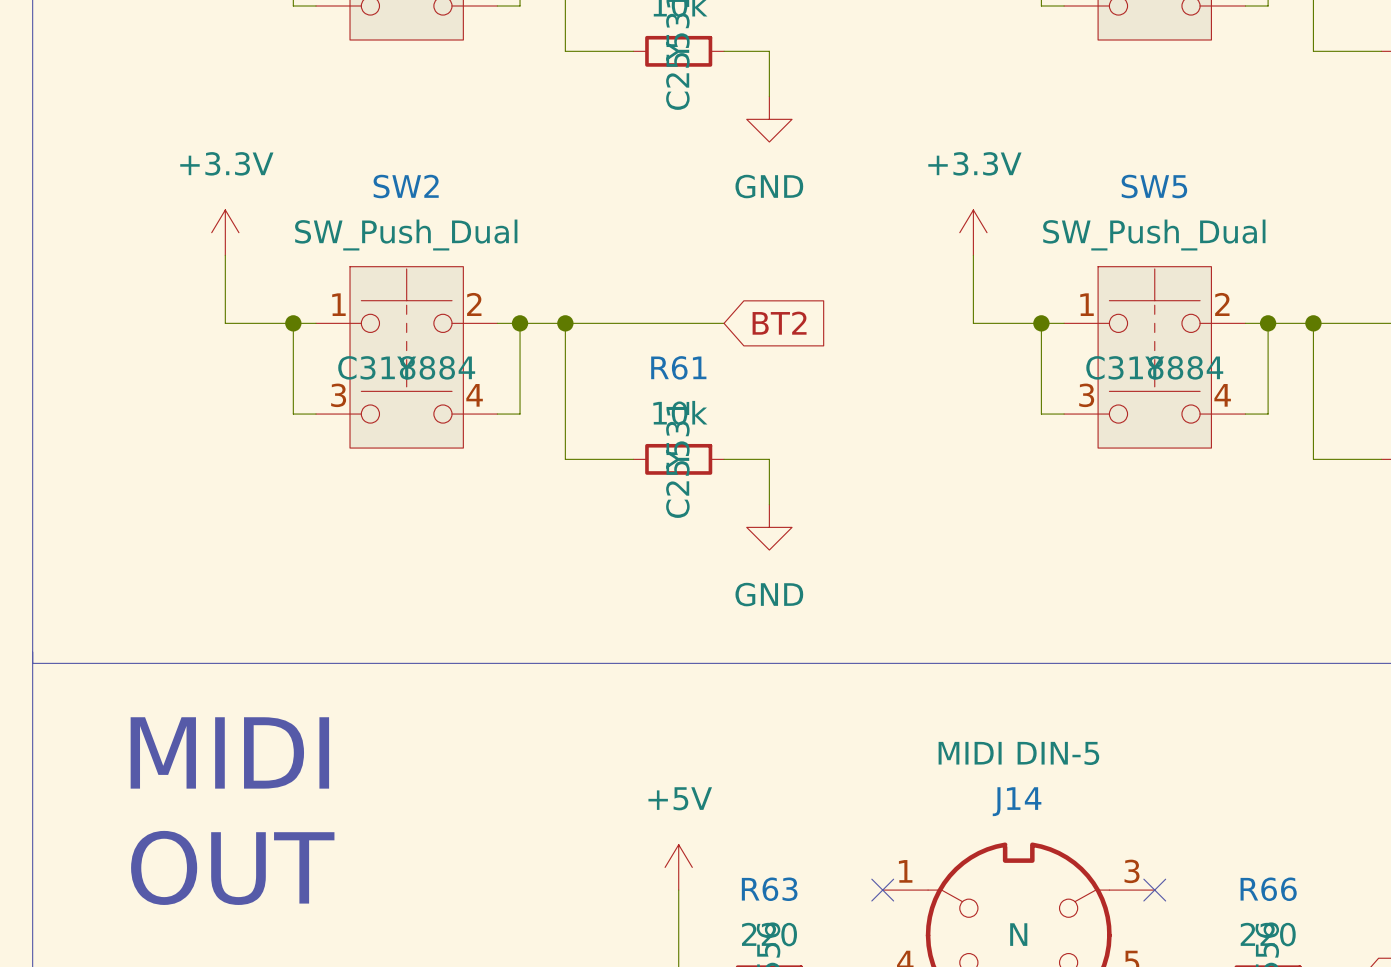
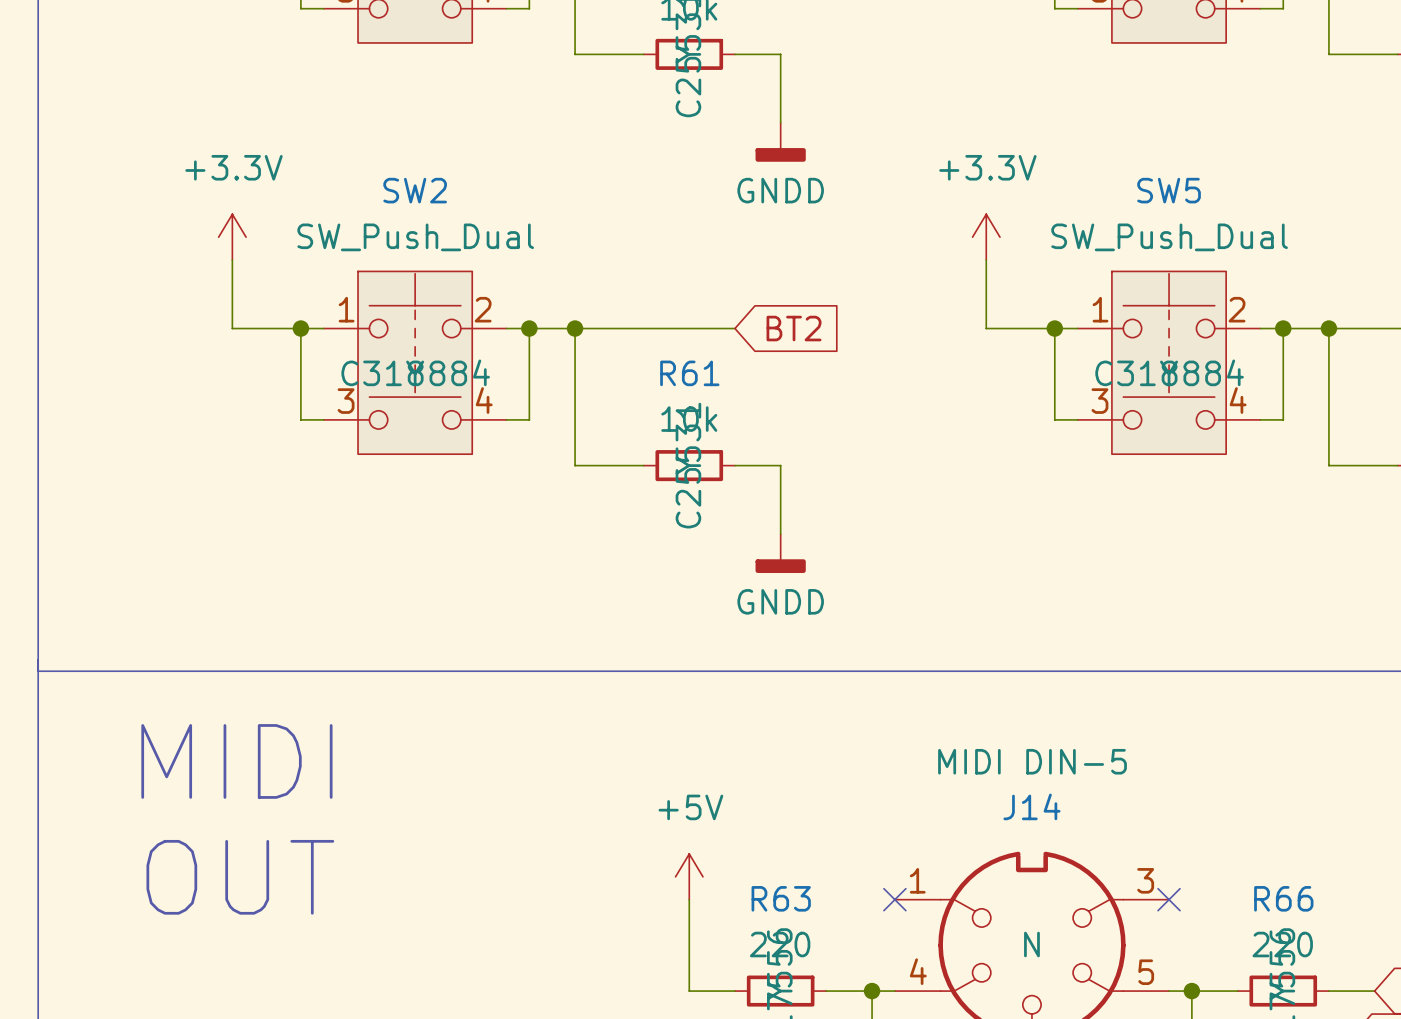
power symbol: GND (769, 119) -> none
power symbol: none -> GNDD (780, 142)
power symbol: GND (769, 527) -> none
power symbol: none -> GNDD (780, 553)

